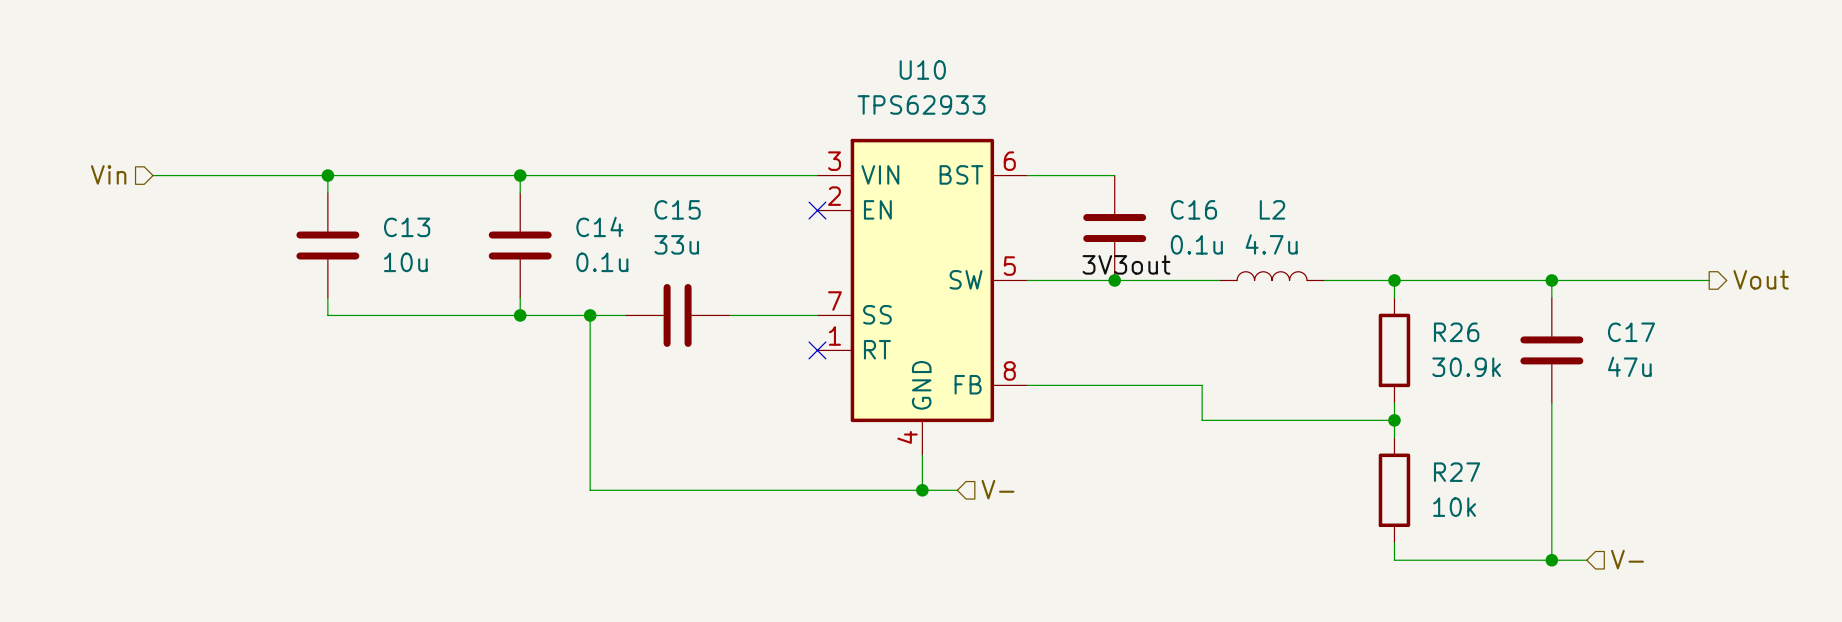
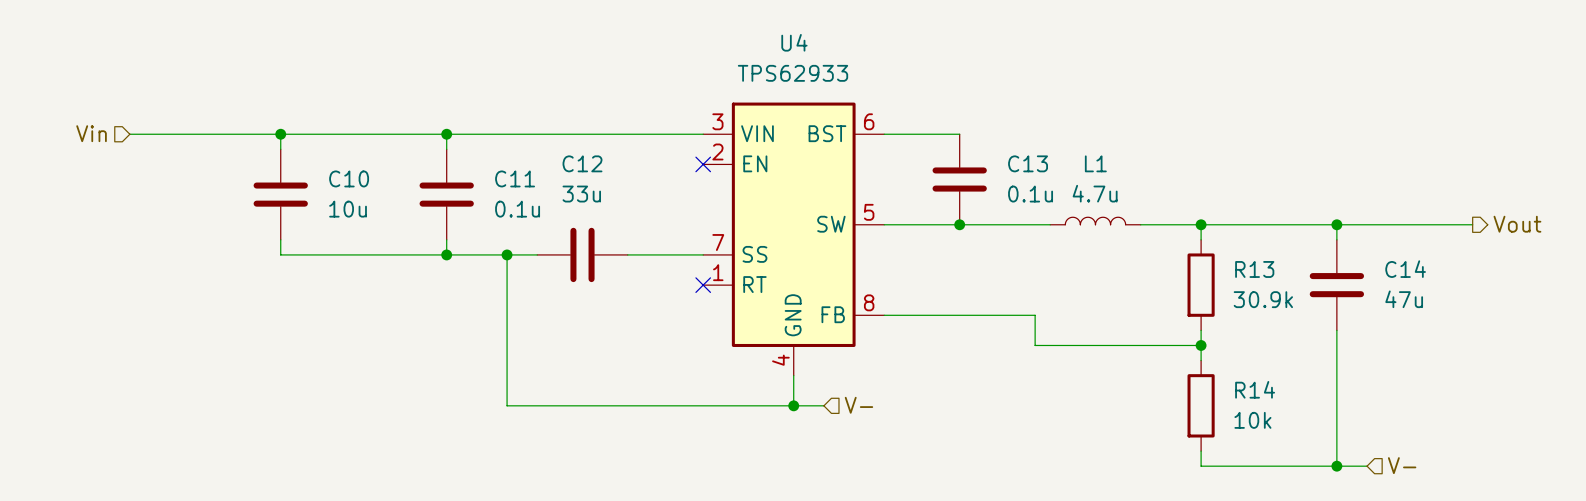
U10 name: U10 (922, 70) -> U4 (794, 42)
C15 name: C15 (677, 209) -> C12 (582, 163)
C16 name: C16 (1193, 209) -> C13 (1028, 163)
L2 name: L2 (1272, 209) -> L1 (1095, 163)
C14 name: C14 (599, 226) -> C11 (515, 178)
C13 name: C13 (407, 227) -> C10 (349, 178)
label: 3V3out (1126, 264) -> none
R26 name: R26 (1456, 332) -> R13 (1254, 269)
C17 name: C17 (1631, 332) -> C14 (1405, 269)
R27 name: R27 (1457, 472) -> R14 (1255, 389)

